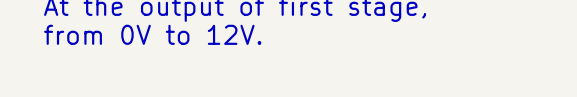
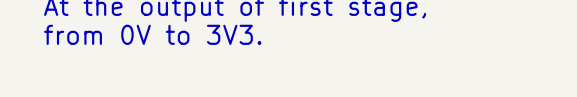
text: from 0V to 12V. (152, 34) -> from 0V to 3V3. (152, 34)

